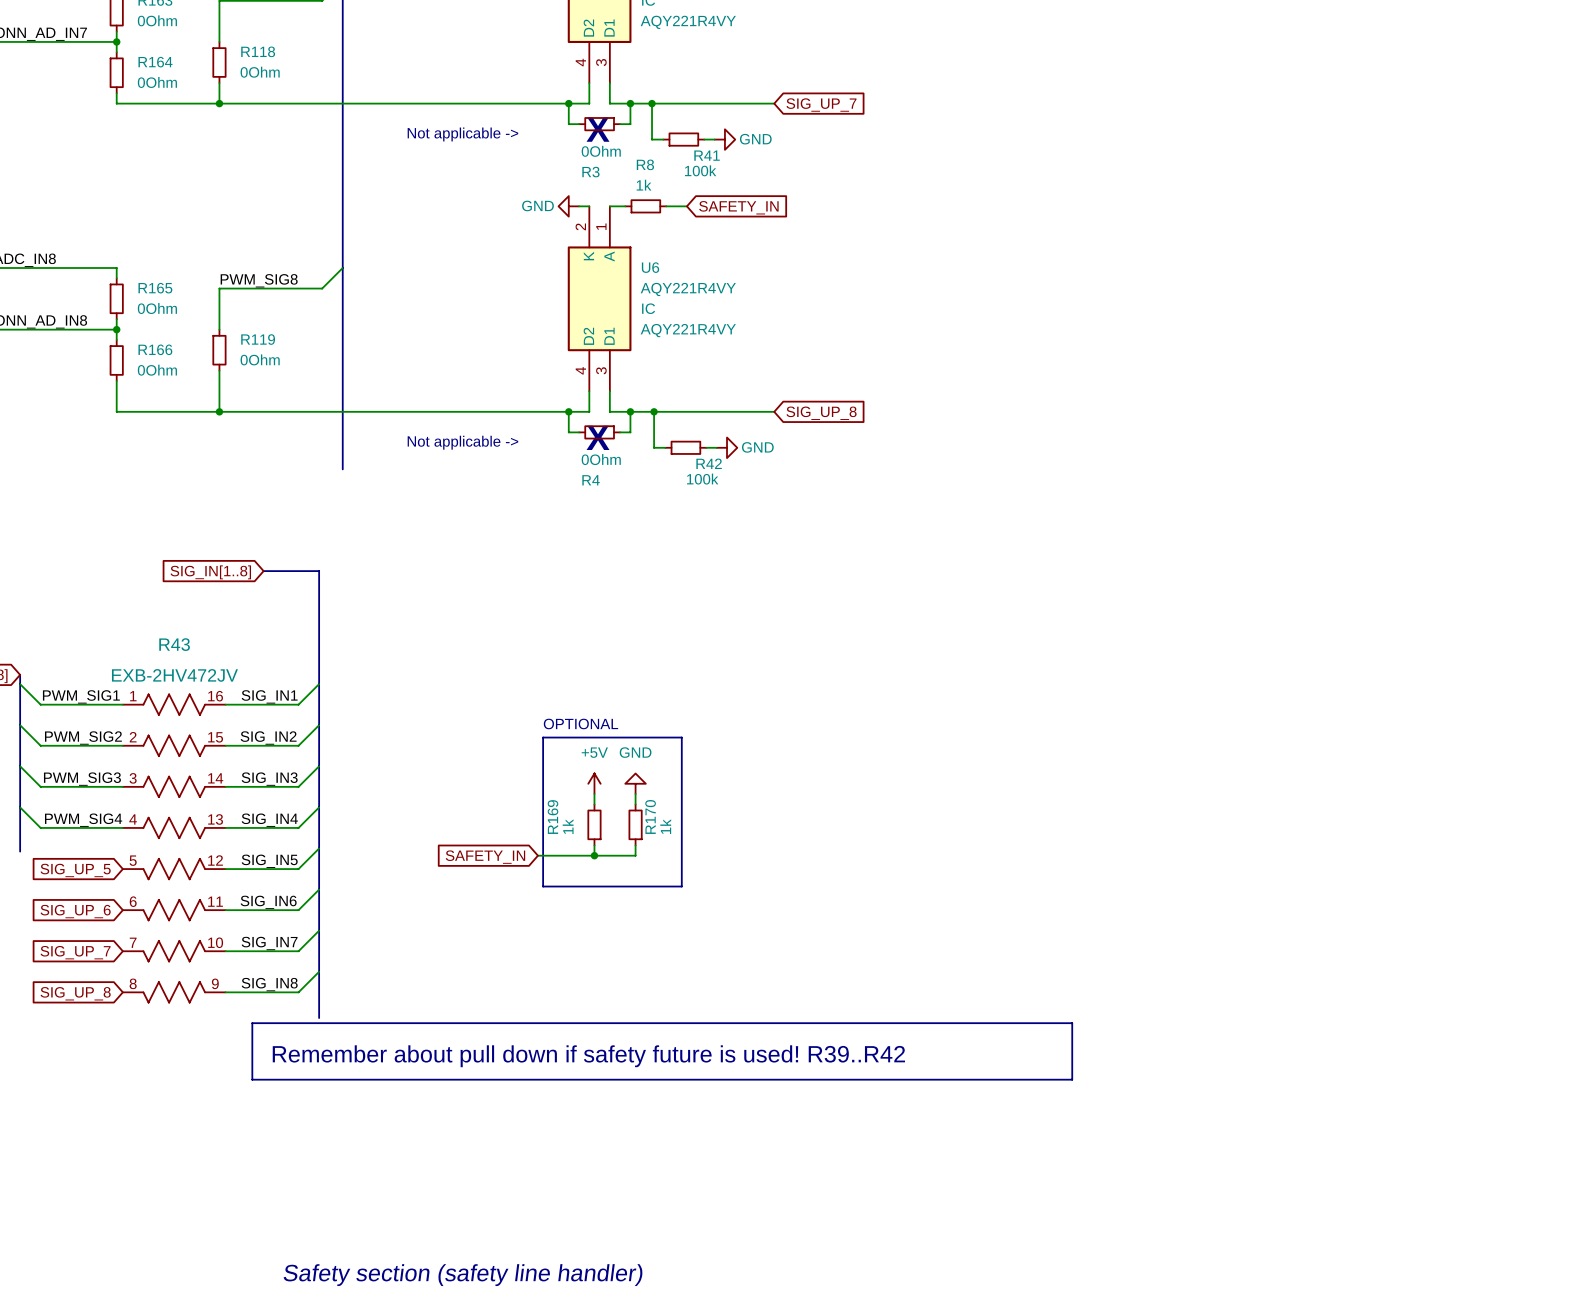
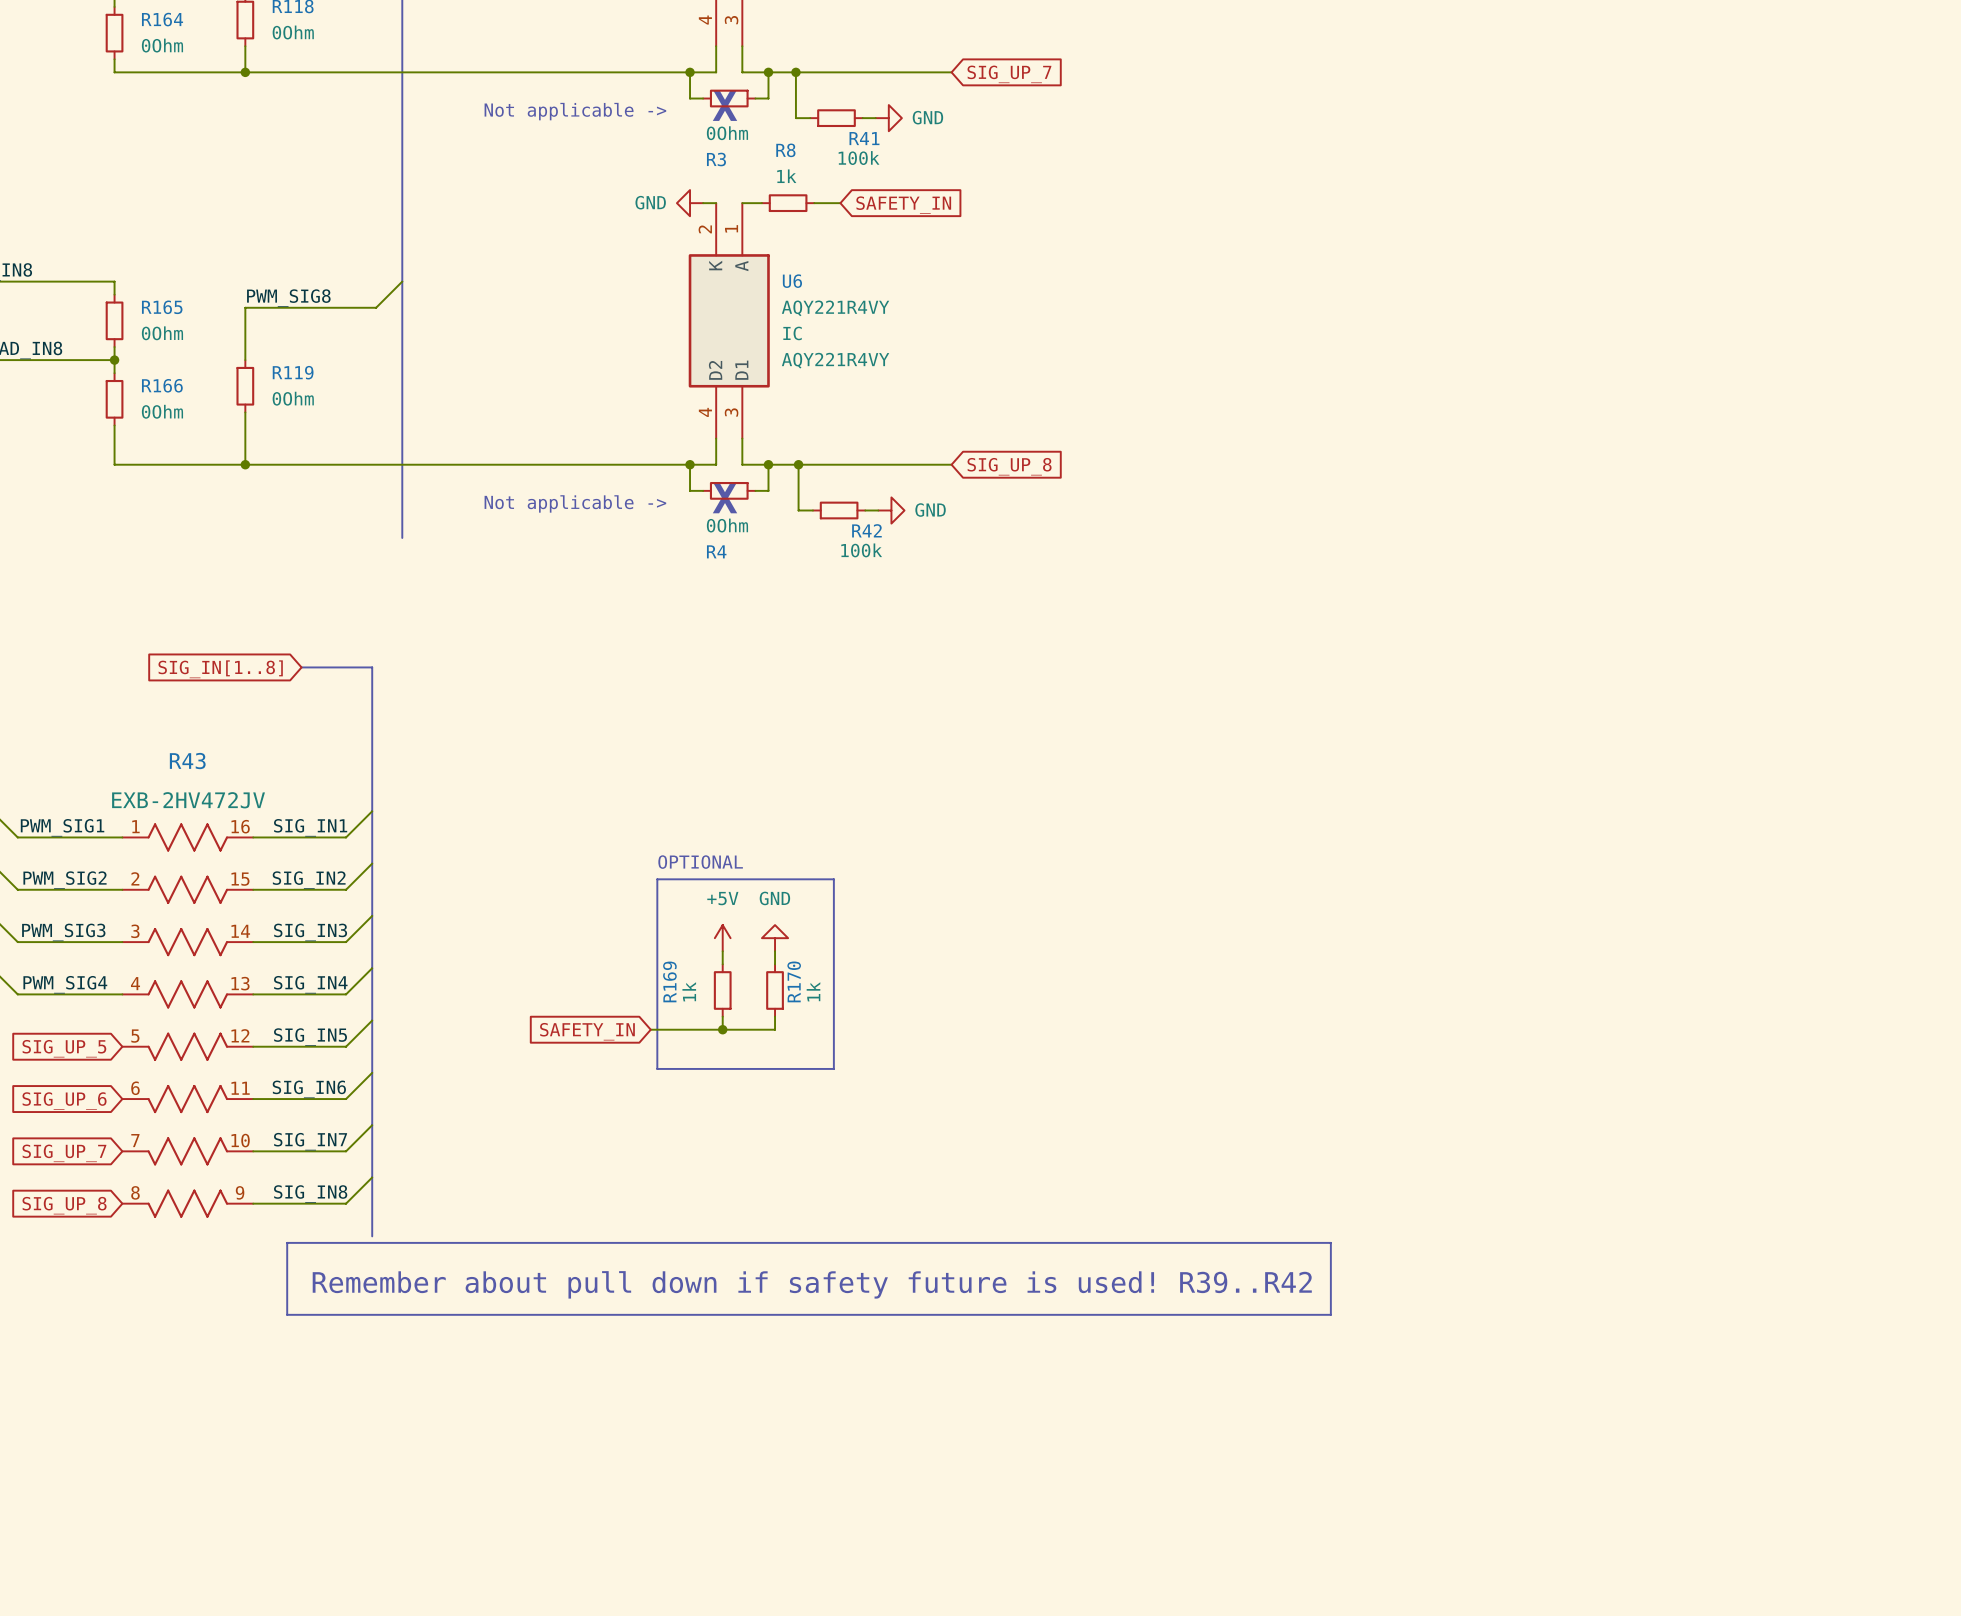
text: Safety section (safety line handler) (463, 1275) -> none

